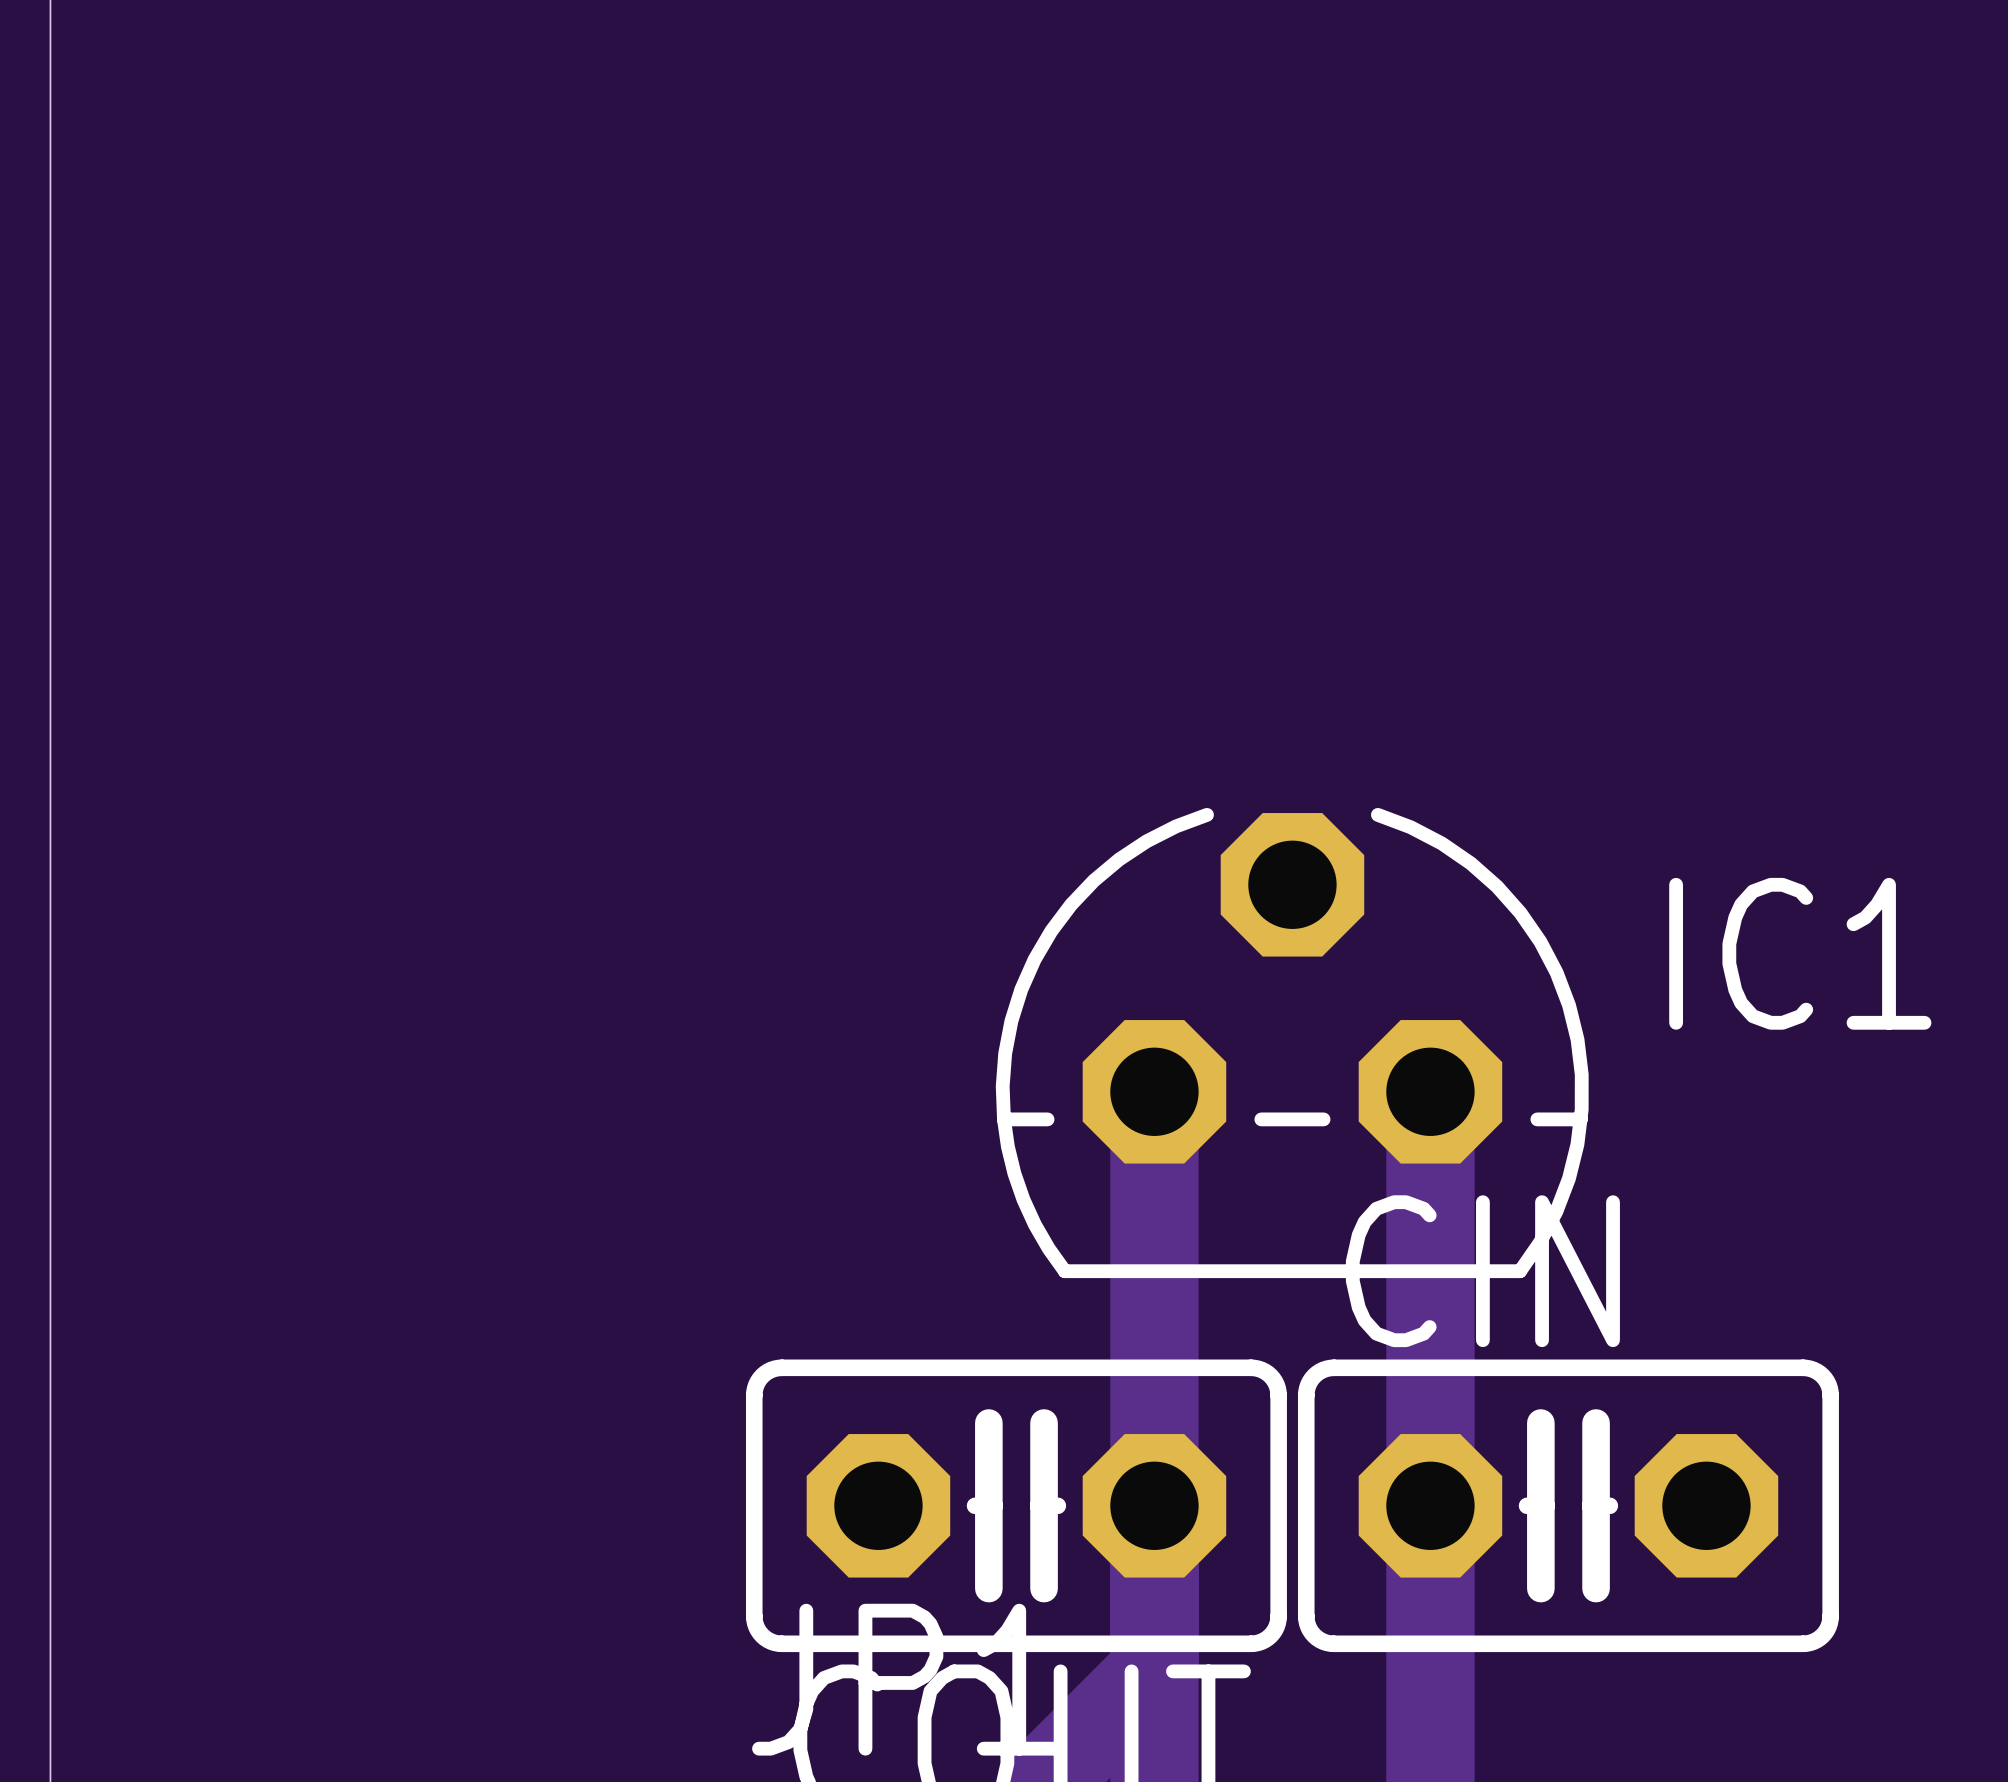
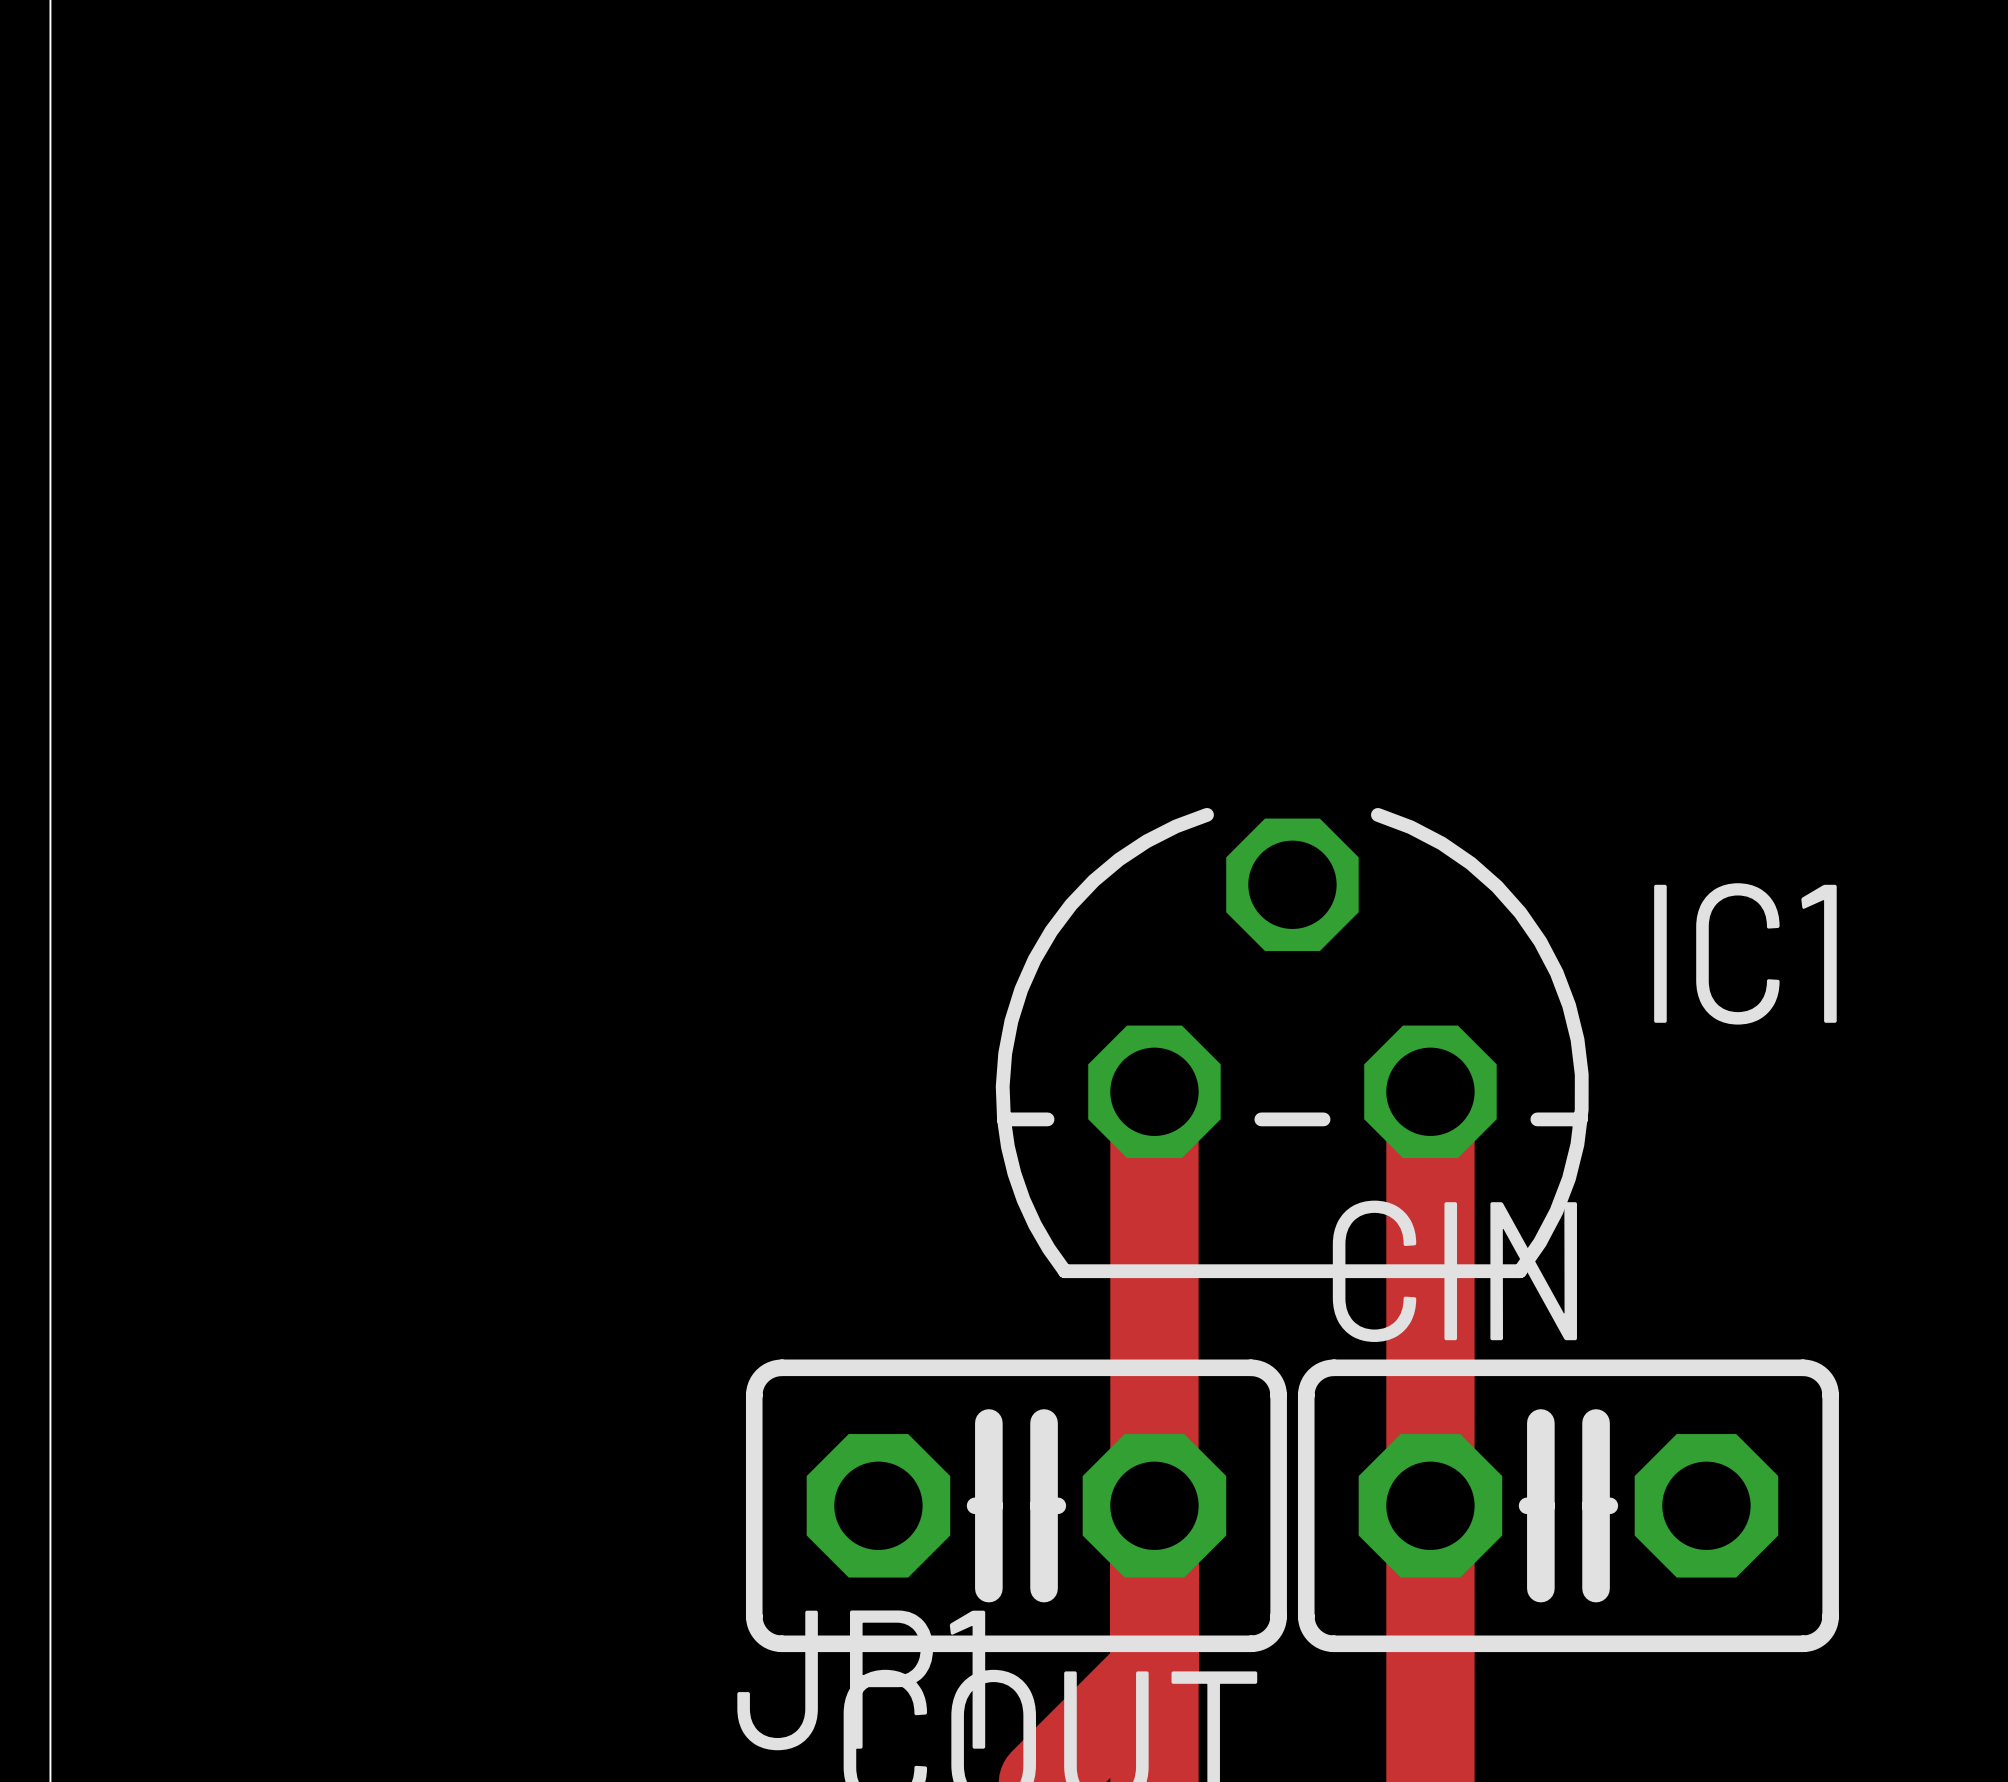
IC1 footprint: [995, 807, 1589, 1279] -> [995, 807, 1589, 1279]

